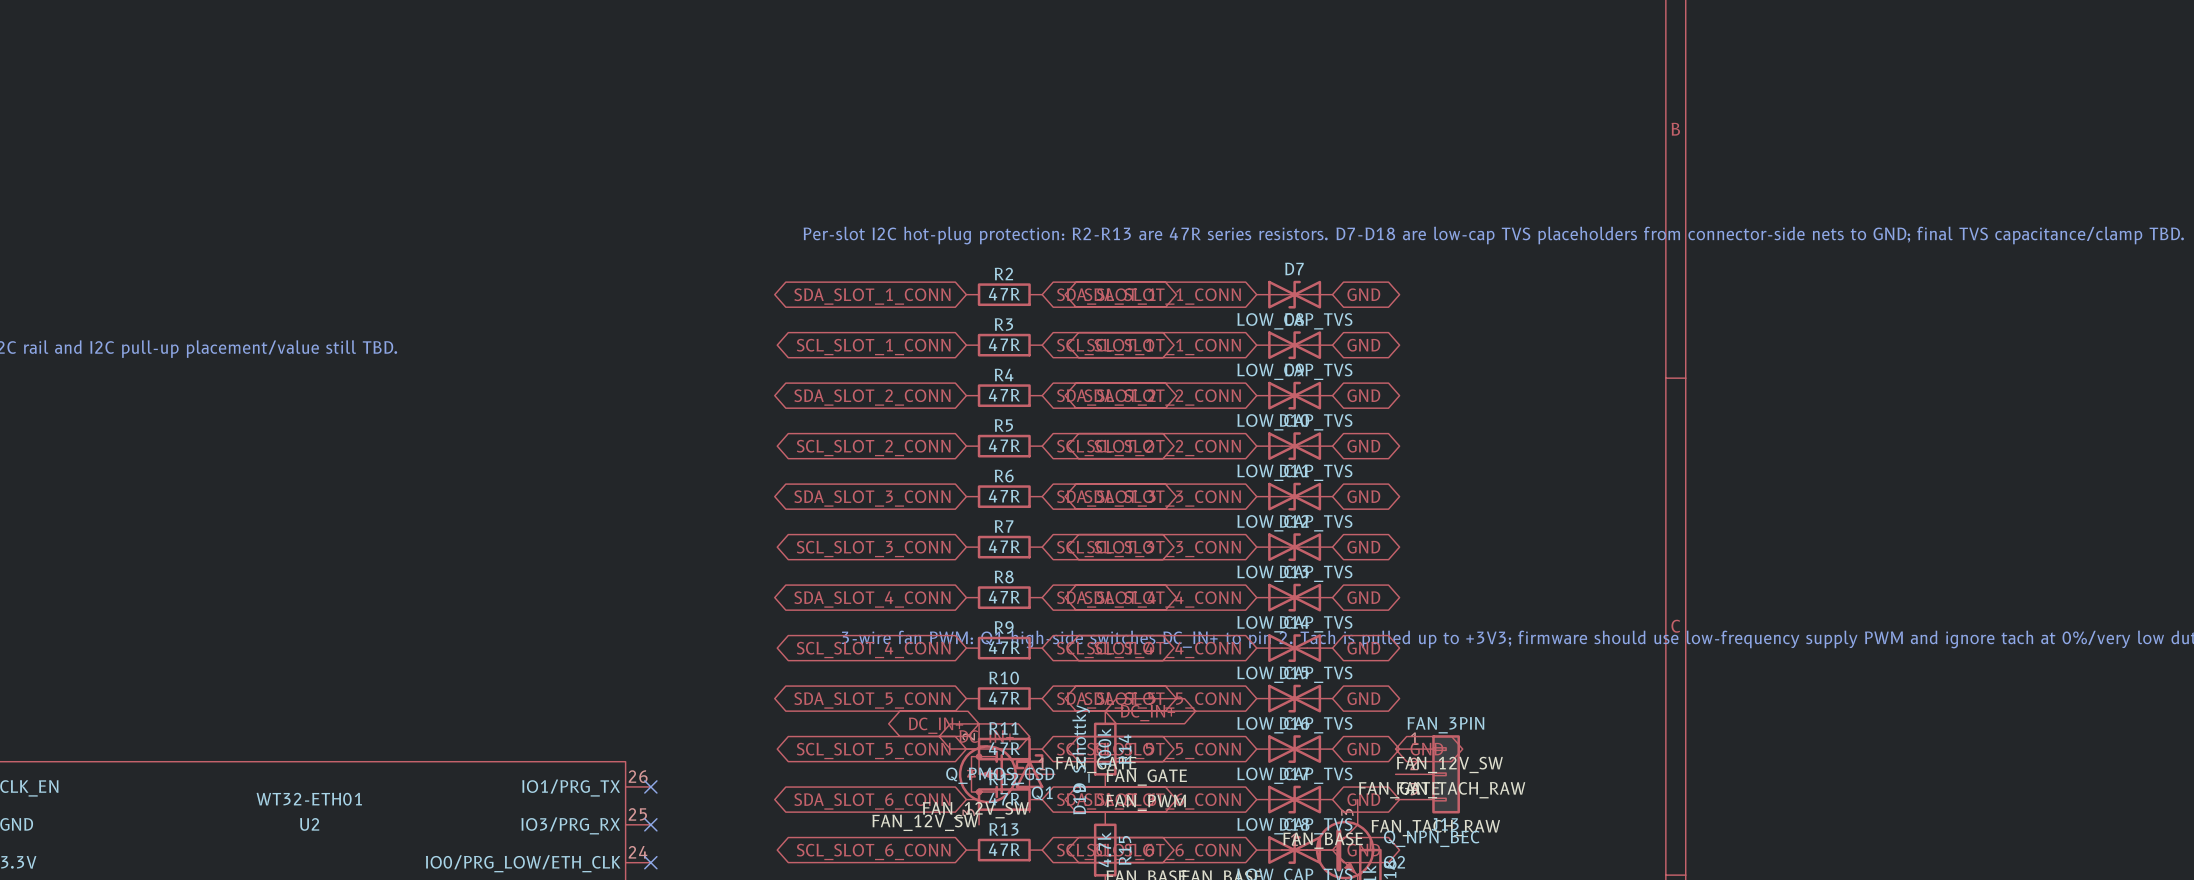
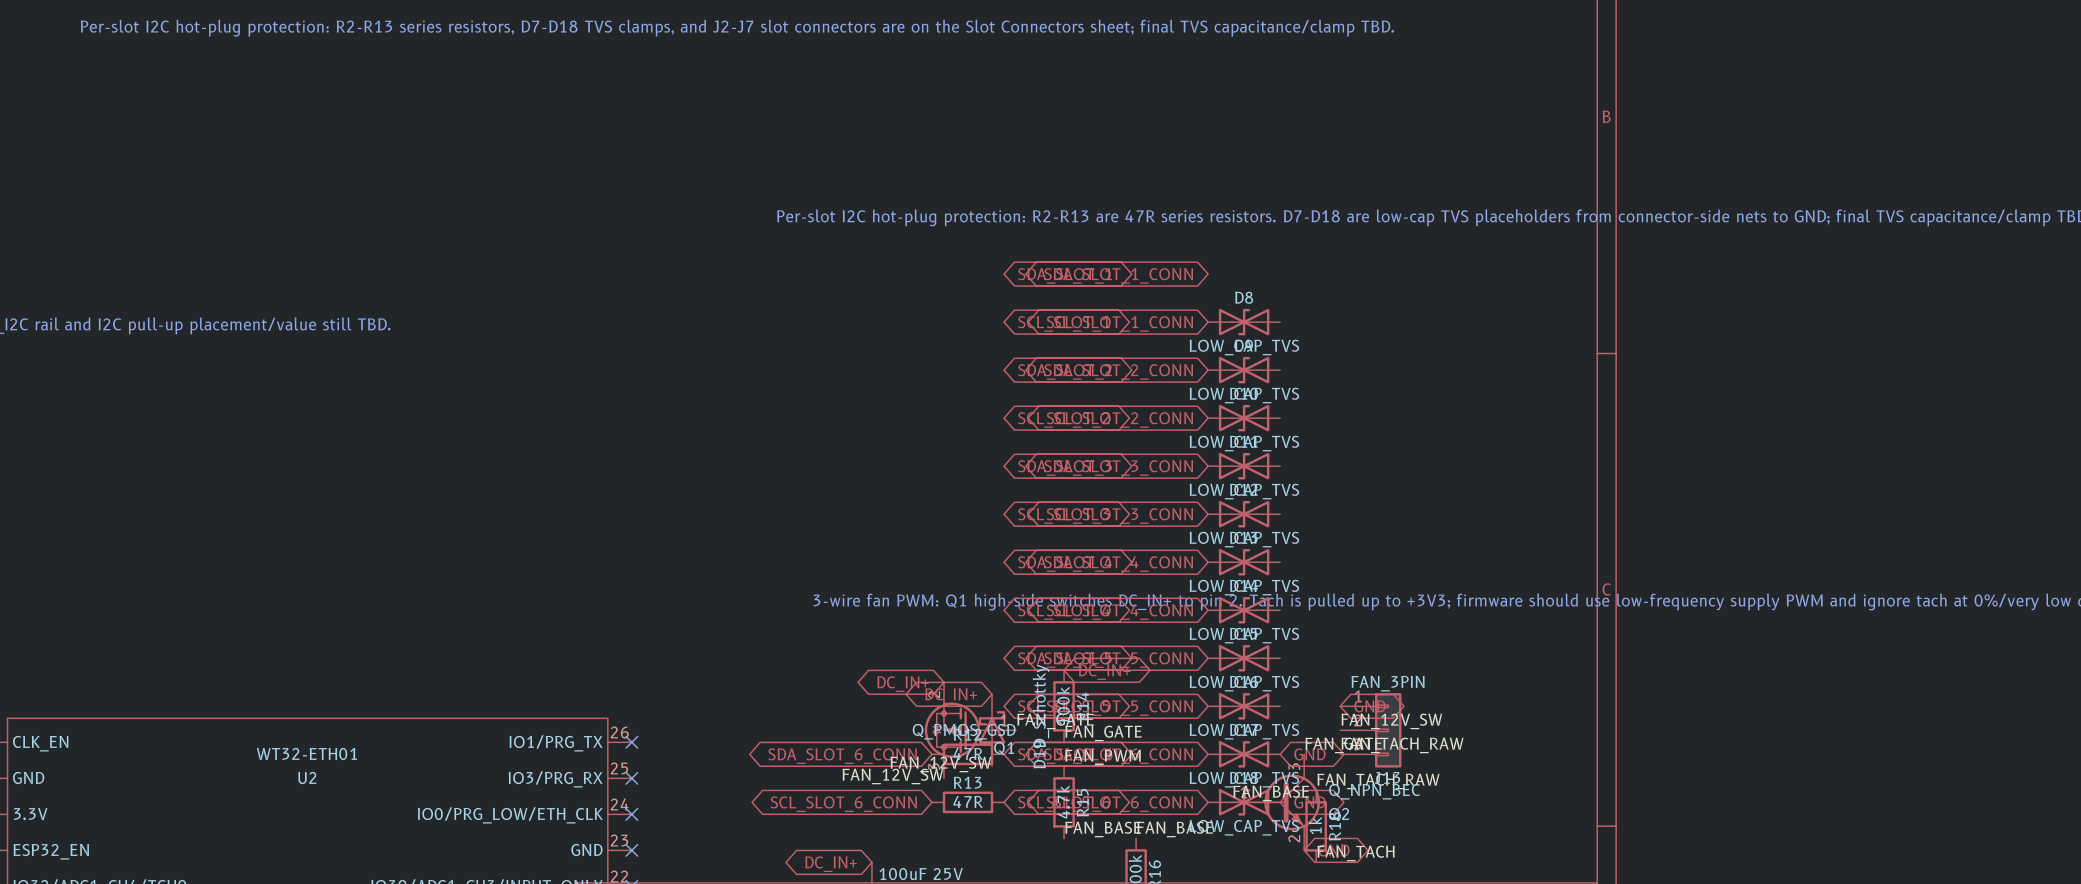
text: none -> Per-slot I2C hot-plug protection: R2-R13 series resistors, D7-D18 TVS clamps, and J2-J7 slot connectors are on the Slot Connectors sheet; final TVS capacitance/clamp TBD. (737, 28)
R2: 47R (1004, 294) -> none
D7: LOW_CAP_TVS (1294, 294) -> none
global label: GND (1363, 294) -> none
global label: SDA_SLOT_1_CONN (872, 296) -> none
R3: 47R (1004, 345) -> none
global label: GND (1363, 345) -> none
global label: SCL_SLOT_1_CONN (873, 347) -> none
R4: 47R (1004, 395) -> none
global label: GND (1363, 395) -> none
global label: SDA_SLOT_2_CONN (872, 397) -> none
R5: 47R (1004, 446) -> none
global label: GND (1363, 446) -> none
global label: SCL_SLOT_2_CONN (873, 448) -> none
R6: 47R (1004, 496) -> none
global label: GND (1363, 496) -> none
global label: SDA_SLOT_3_CONN (872, 498) -> none
R7: 47R (1004, 547) -> none
global label: GND (1363, 547) -> none
global label: SCL_SLOT_3_CONN (873, 549) -> none
R8: 47R (1004, 597) -> none
global label: GND (1363, 597) -> none
global label: SDA_SLOT_4_CONN (872, 599) -> none
R9: 47R (1004, 648) -> none
global label: GND (1363, 648) -> none
global label: SCL_SLOT_4_CONN (873, 649) -> none
R10: 47R (1004, 698) -> none
global label: GND (1363, 698) -> none
global label: SDA_SLOT_5_CONN (872, 700) -> none
R11: 47R (1004, 749) -> none
global label: GND (1363, 749) -> none
global label: SCL_SLOT_5_CONN (873, 750) -> none

